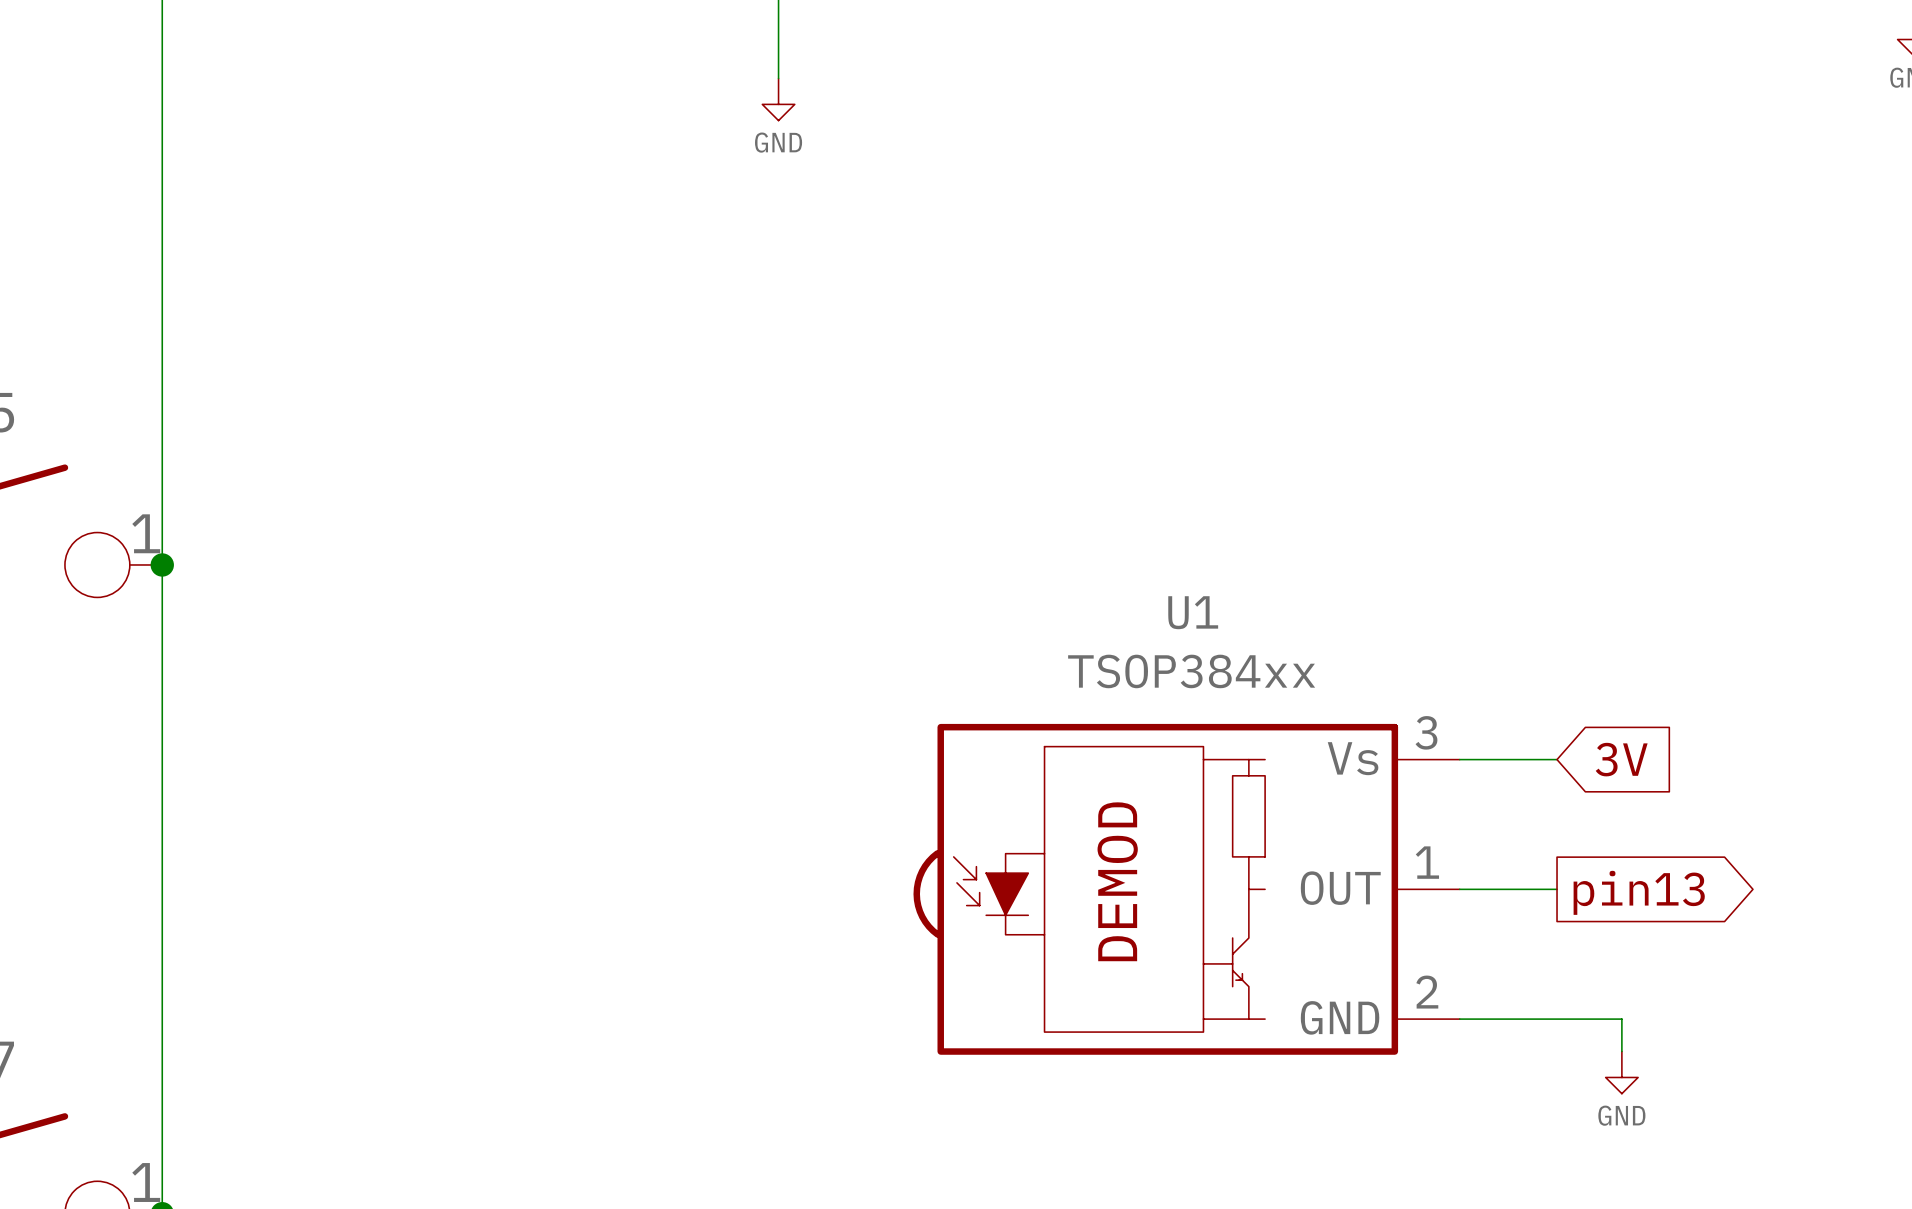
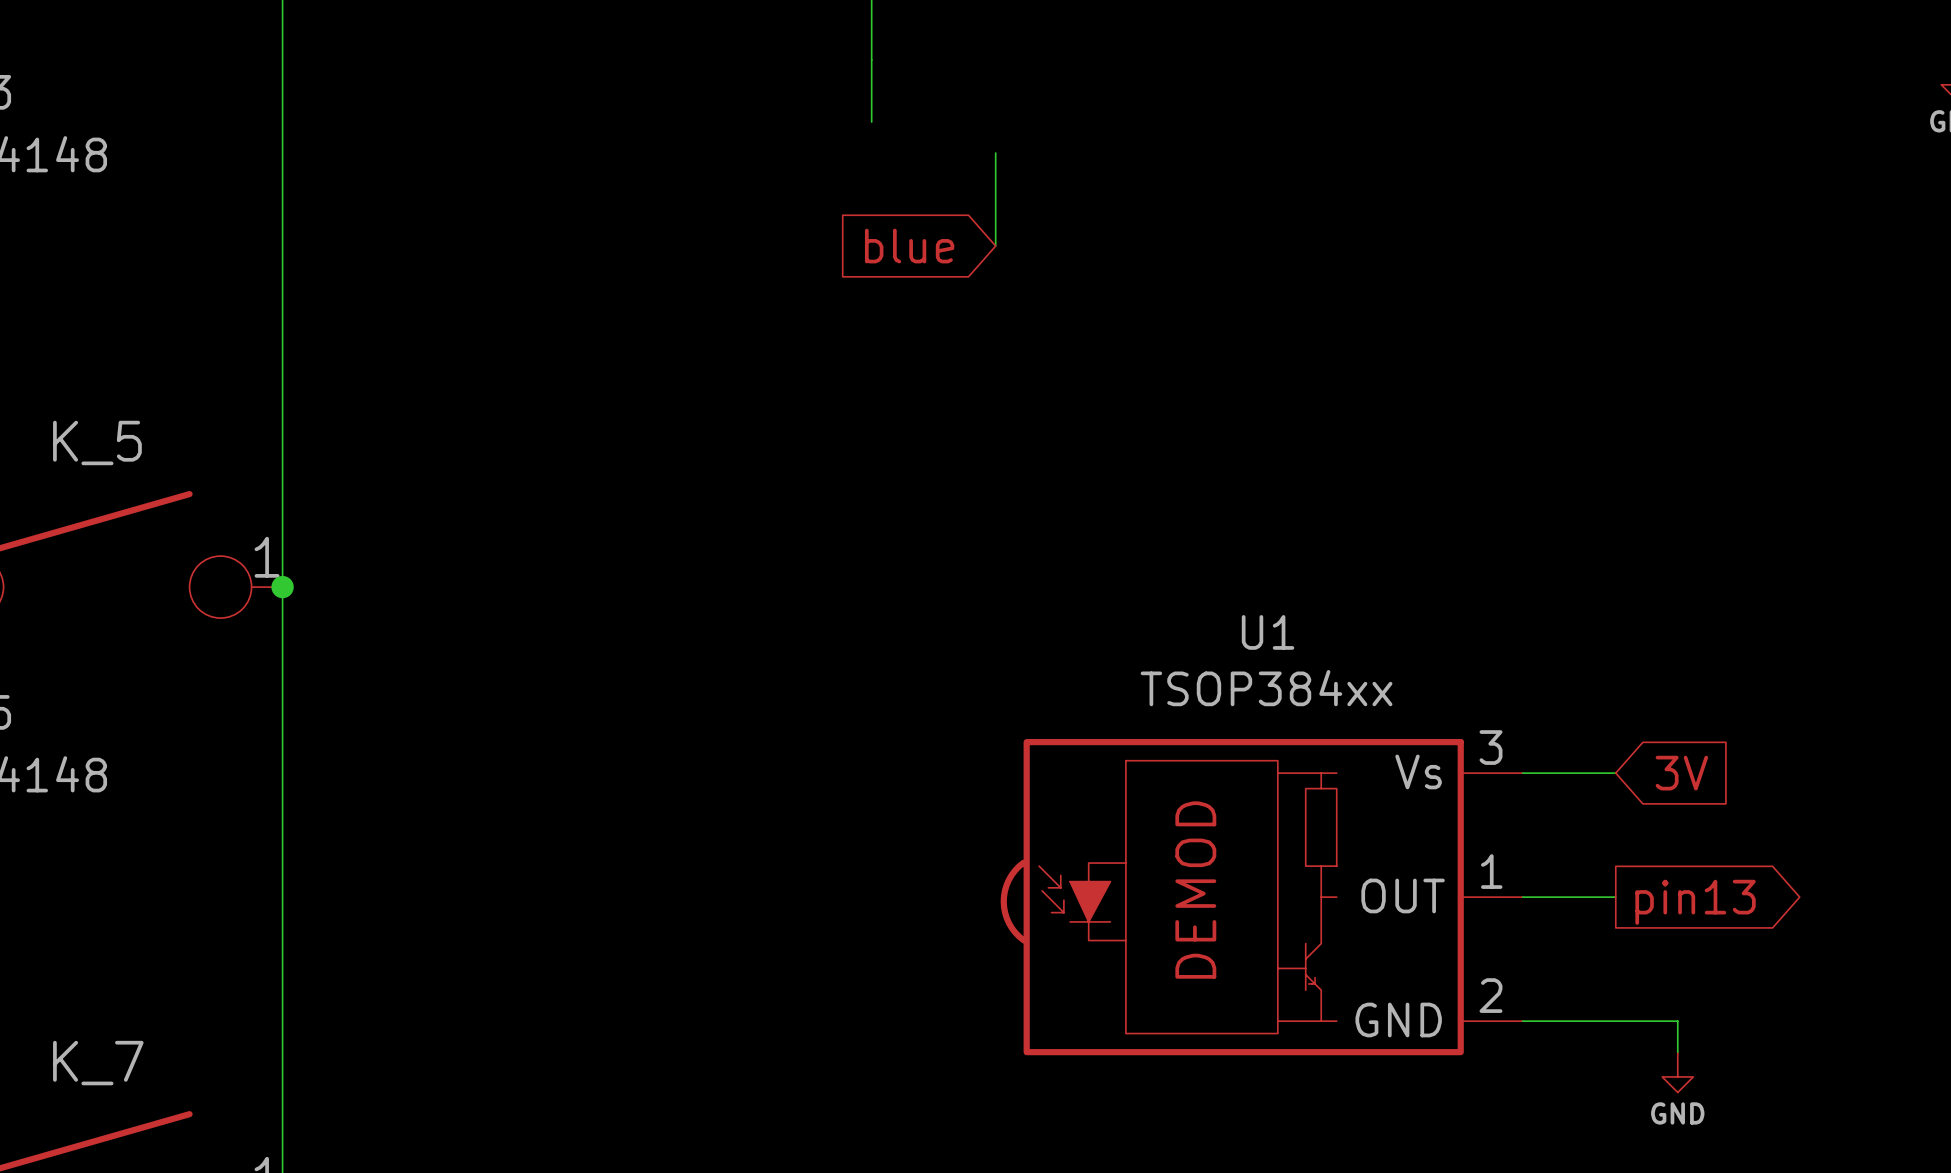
power symbol: GND (778, 99) -> none
wire: none -> (995, 153) (995, 246)
global label: none -> blue (909, 246)

